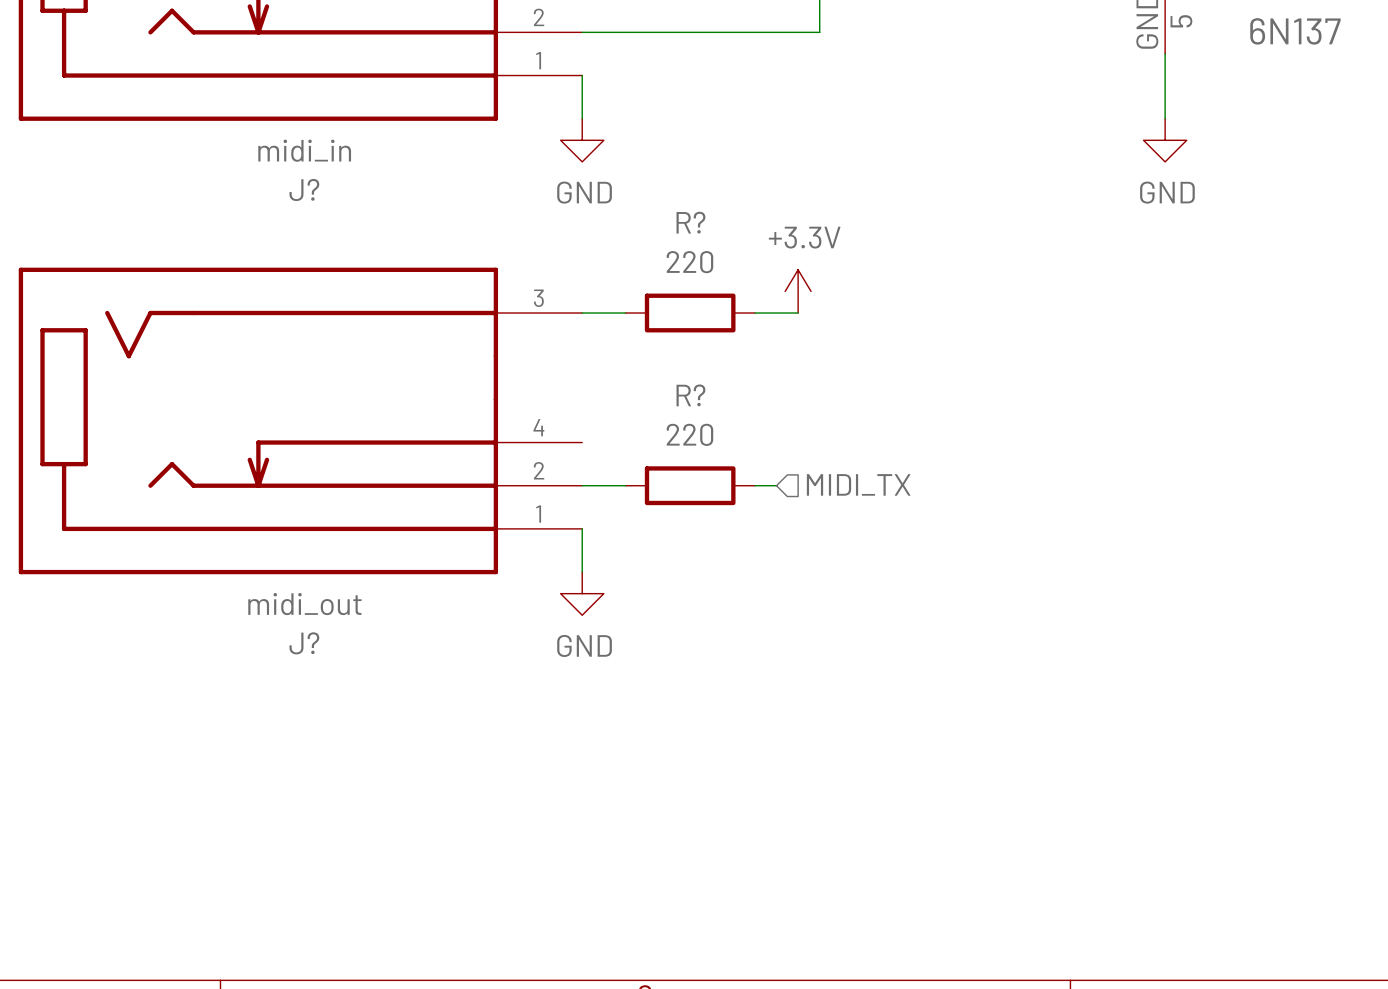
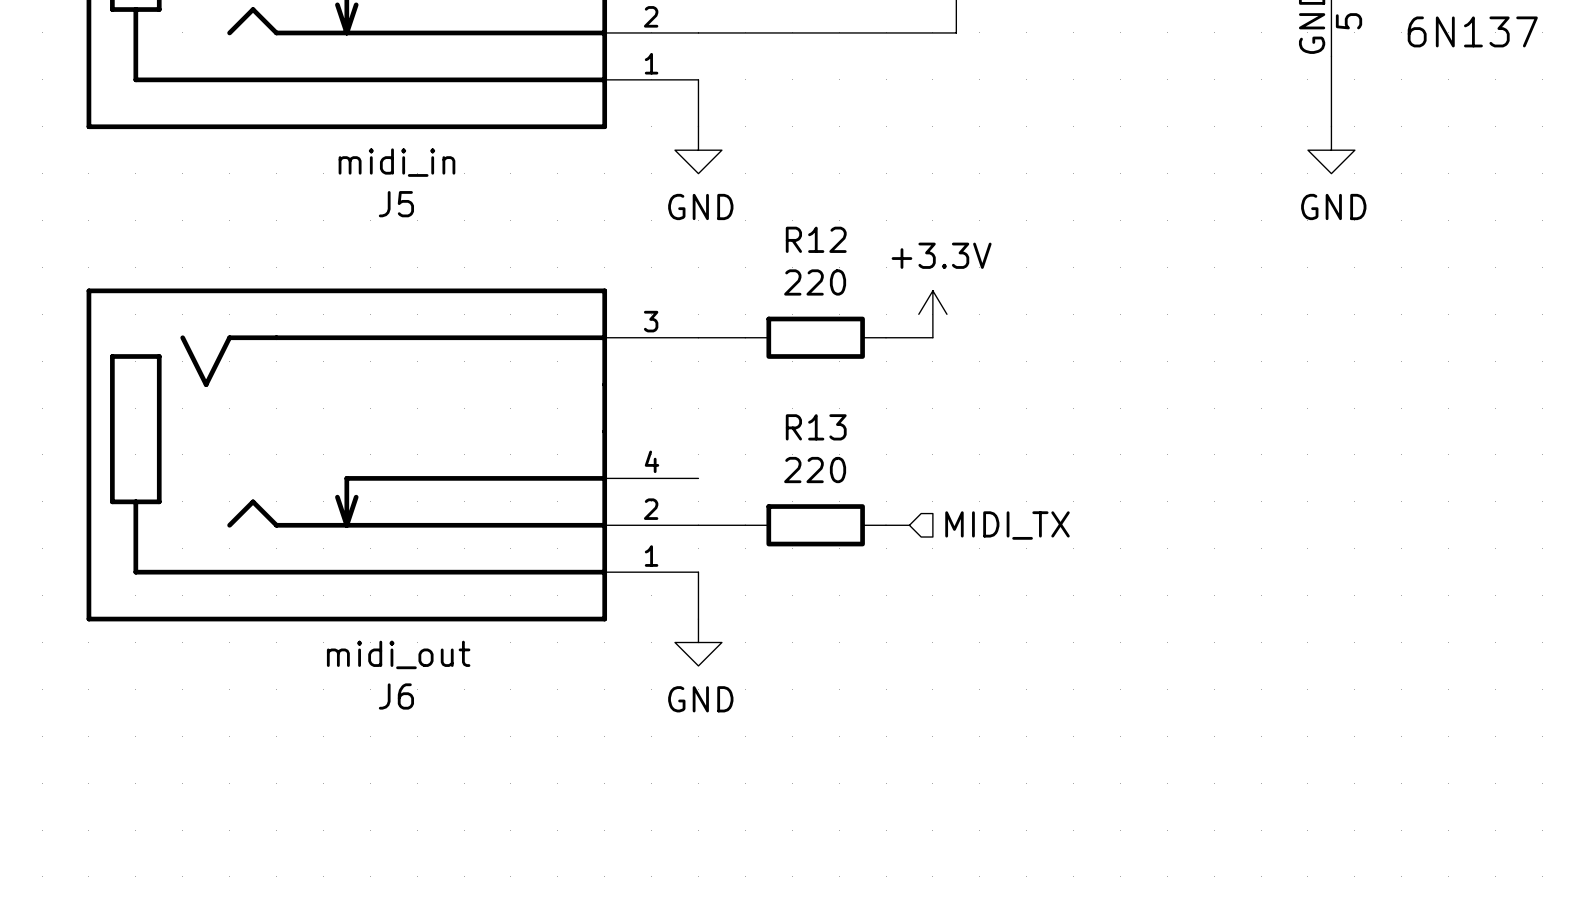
J? name: J? (304, 189) -> J5 (396, 204)
R? name: R? (690, 222) -> R12 (816, 239)
R? name: R? (690, 395) -> R13 (816, 427)
J? name: J? (304, 643) -> J6 (396, 696)

